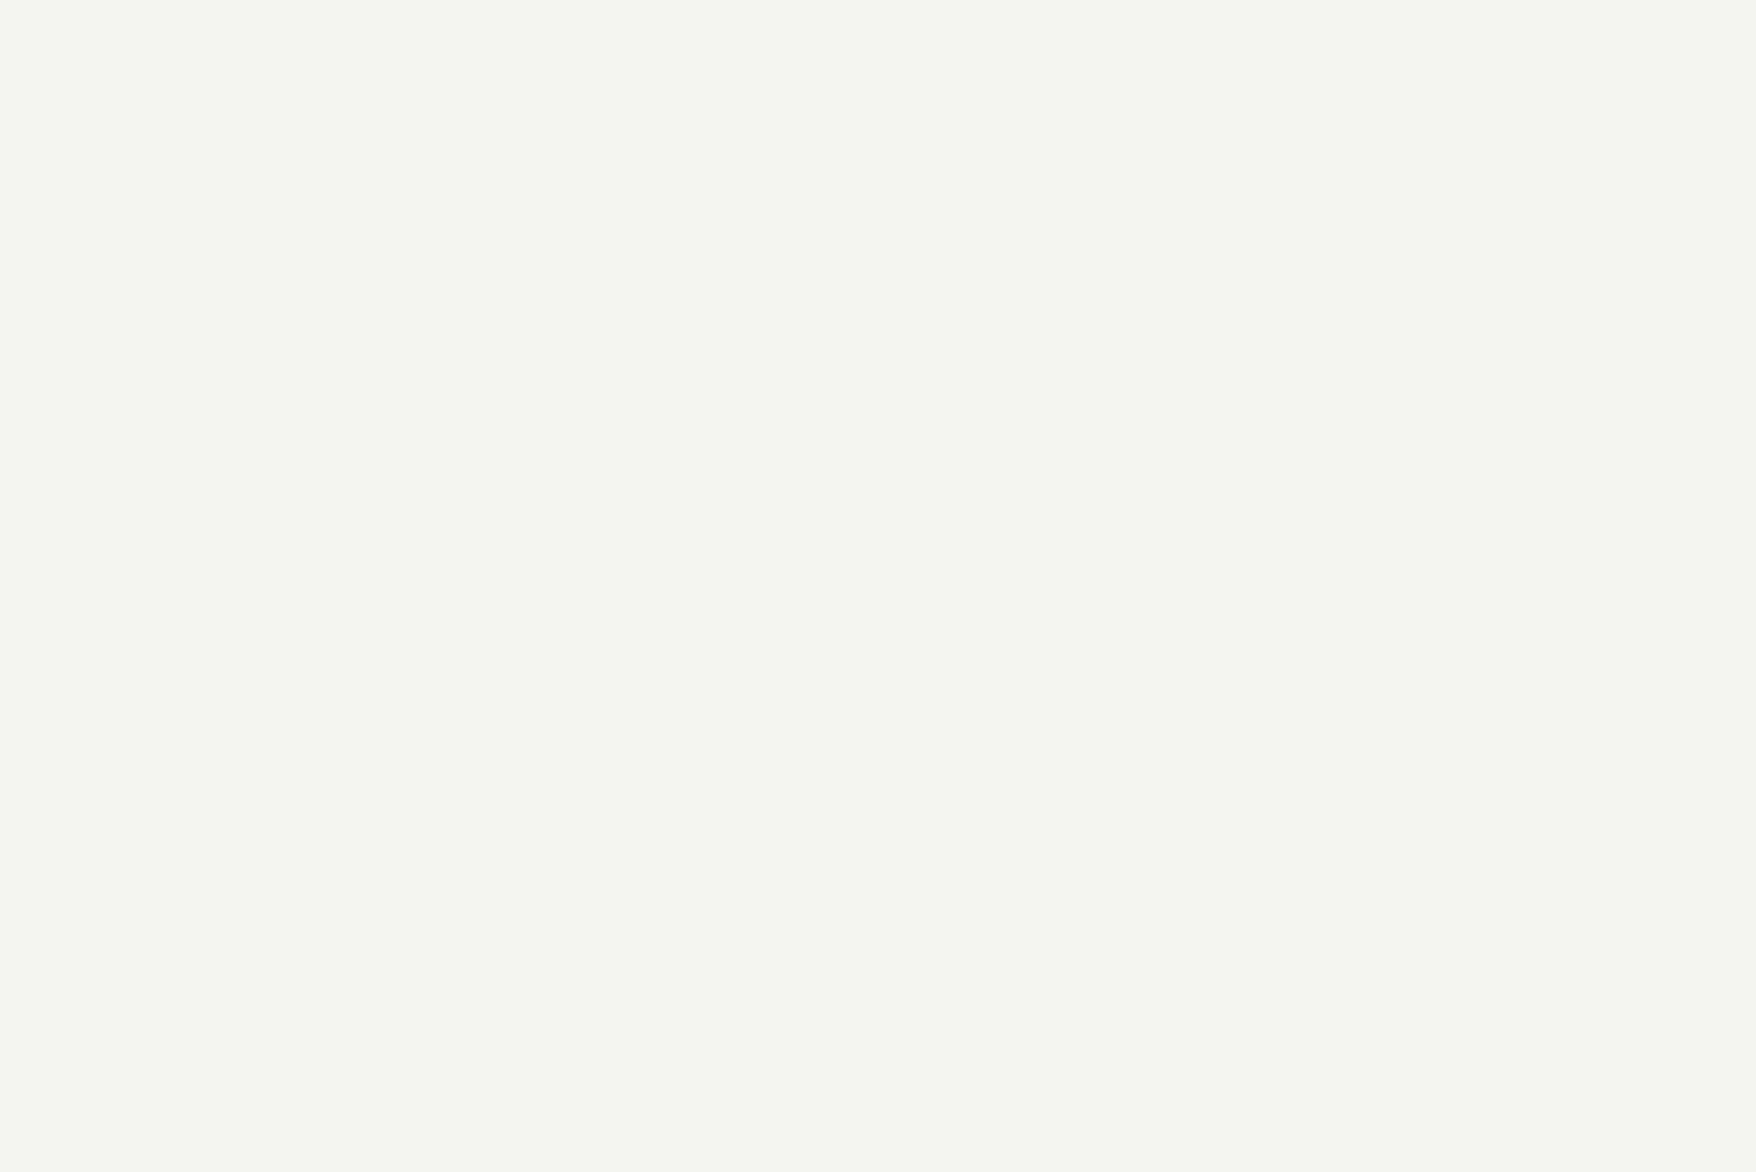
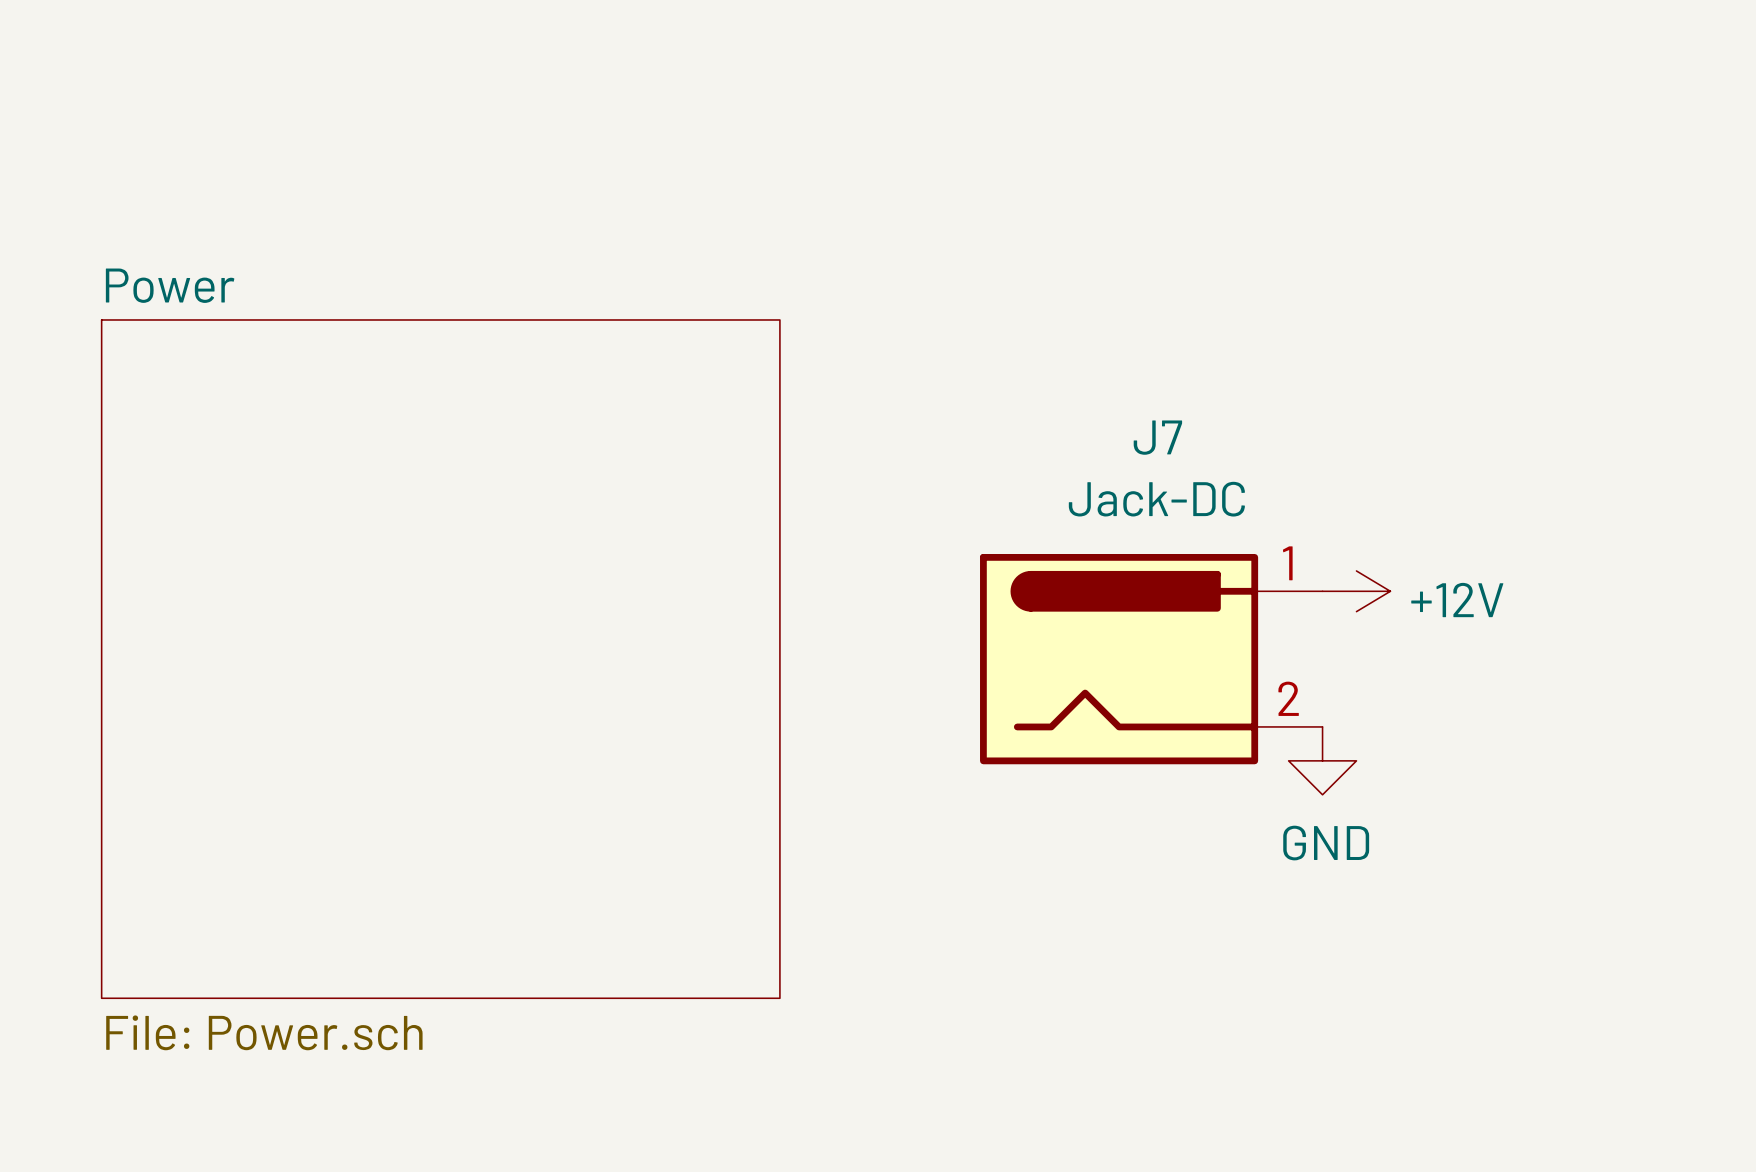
power symbol: none -> +12V (1356, 591)
sheet Power: none -> File: Power.sch (440, 659)
J7: none -> Jack-DC (1151, 659)
power symbol: none -> GND (1322, 760)

